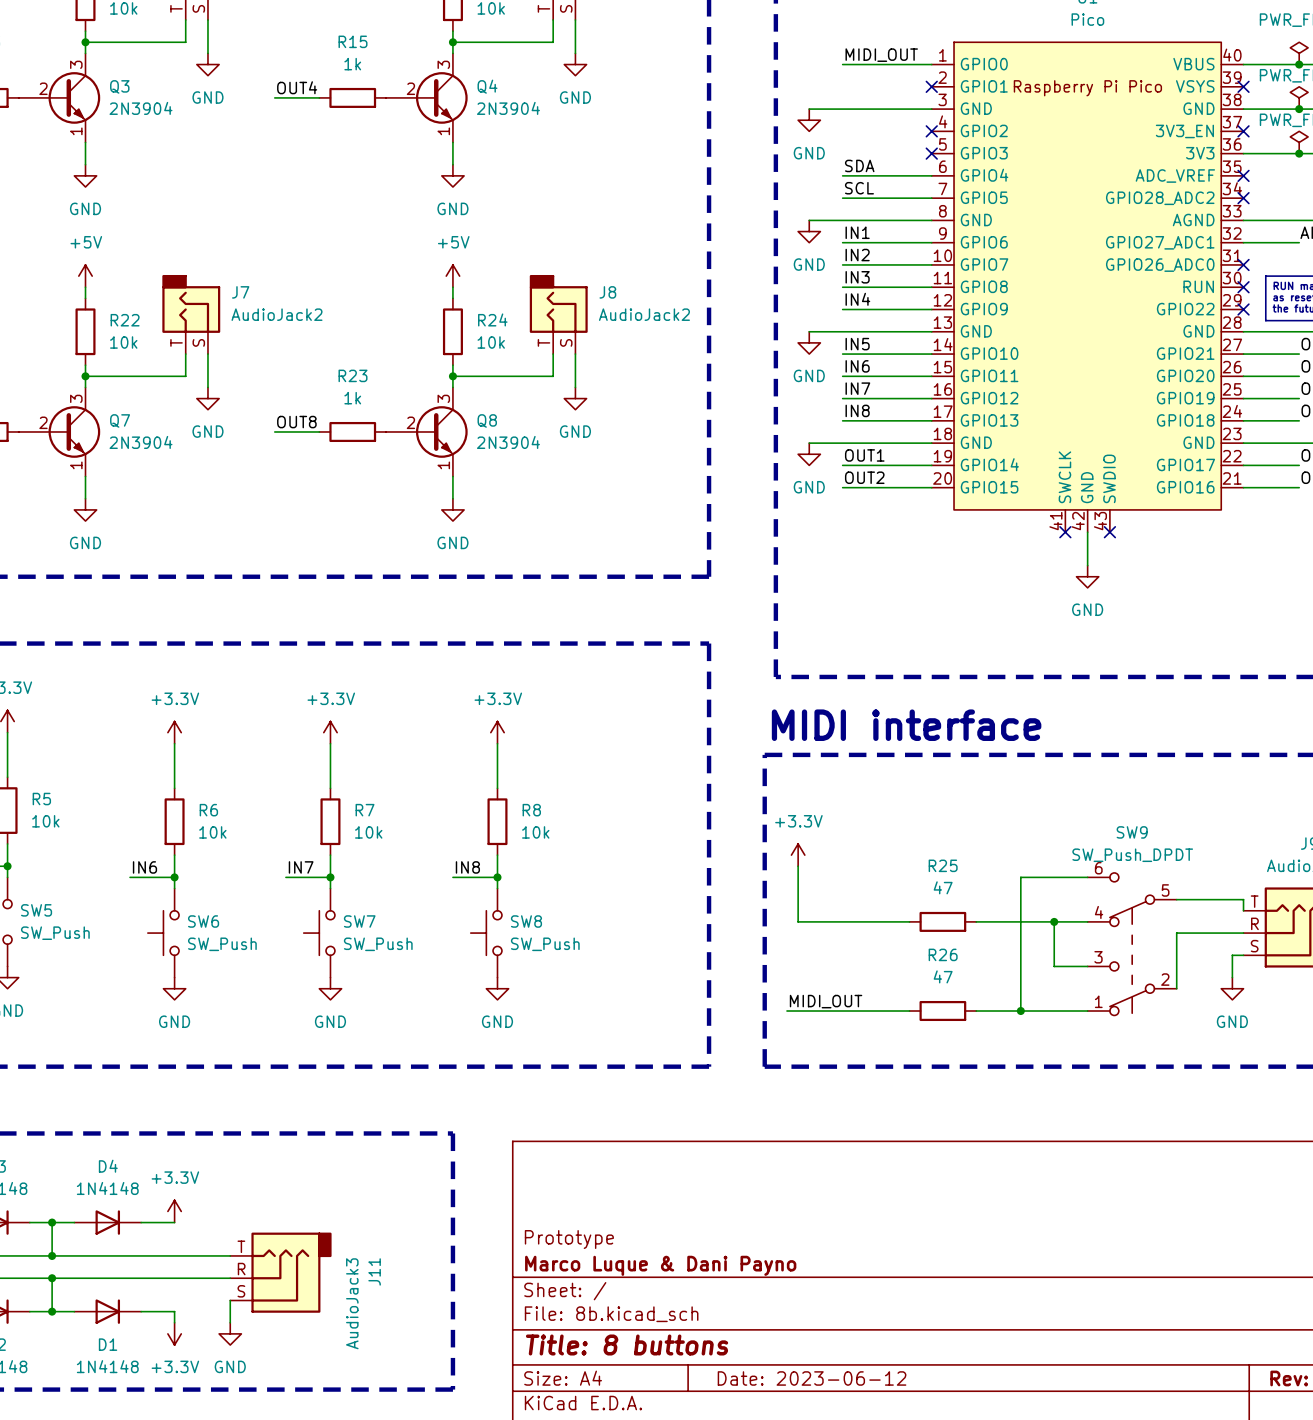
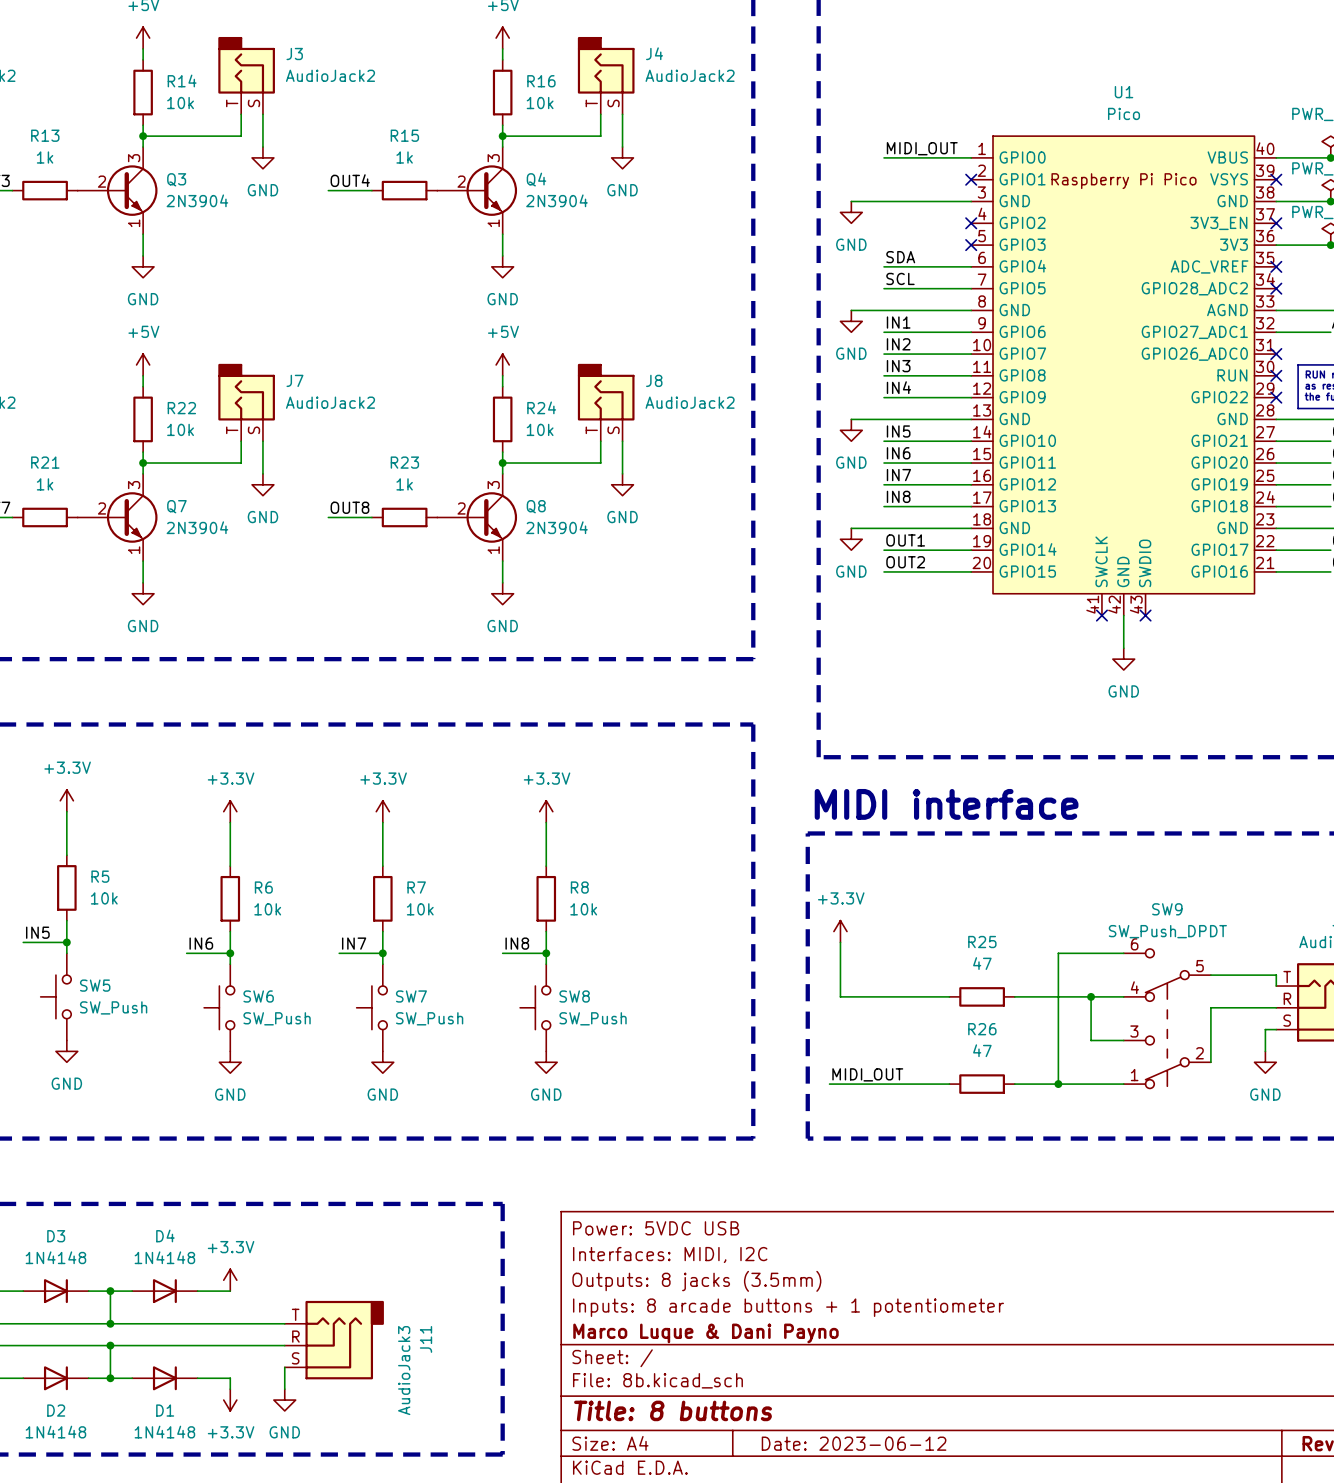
title block: none -> Power: 5VDC USB (656, 1228)
title block: none -> Interfaces: MIDI, I2C (670, 1254)
title block: none -> Outputs: 8 jacks (3.5mm) (696, 1281)
title block: Prototype (569, 1239) -> Inputs: 8 arcade buttons + 1 potentiometer (788, 1307)

